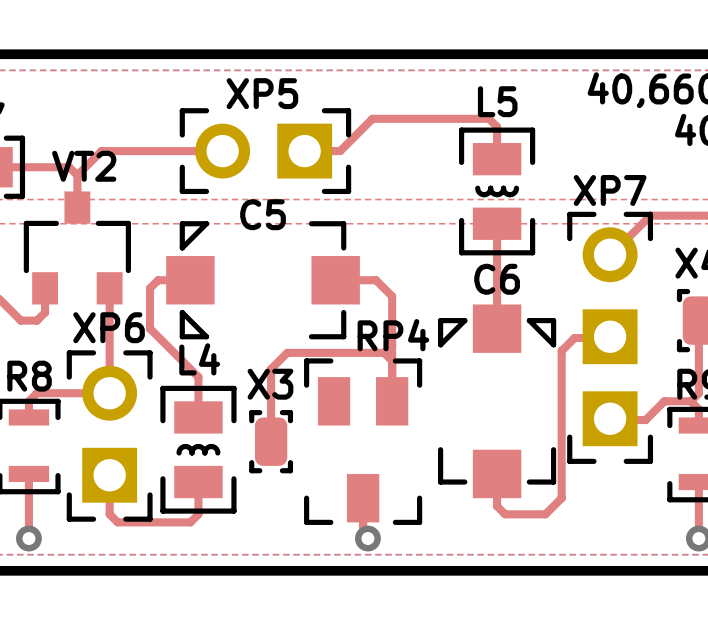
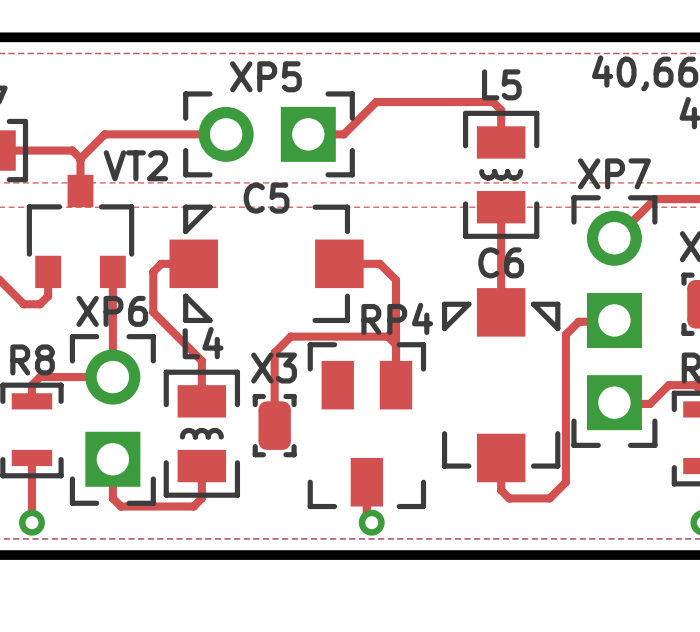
VT2 name position: VT2 (84, 166) -> VT2 (135, 165)

